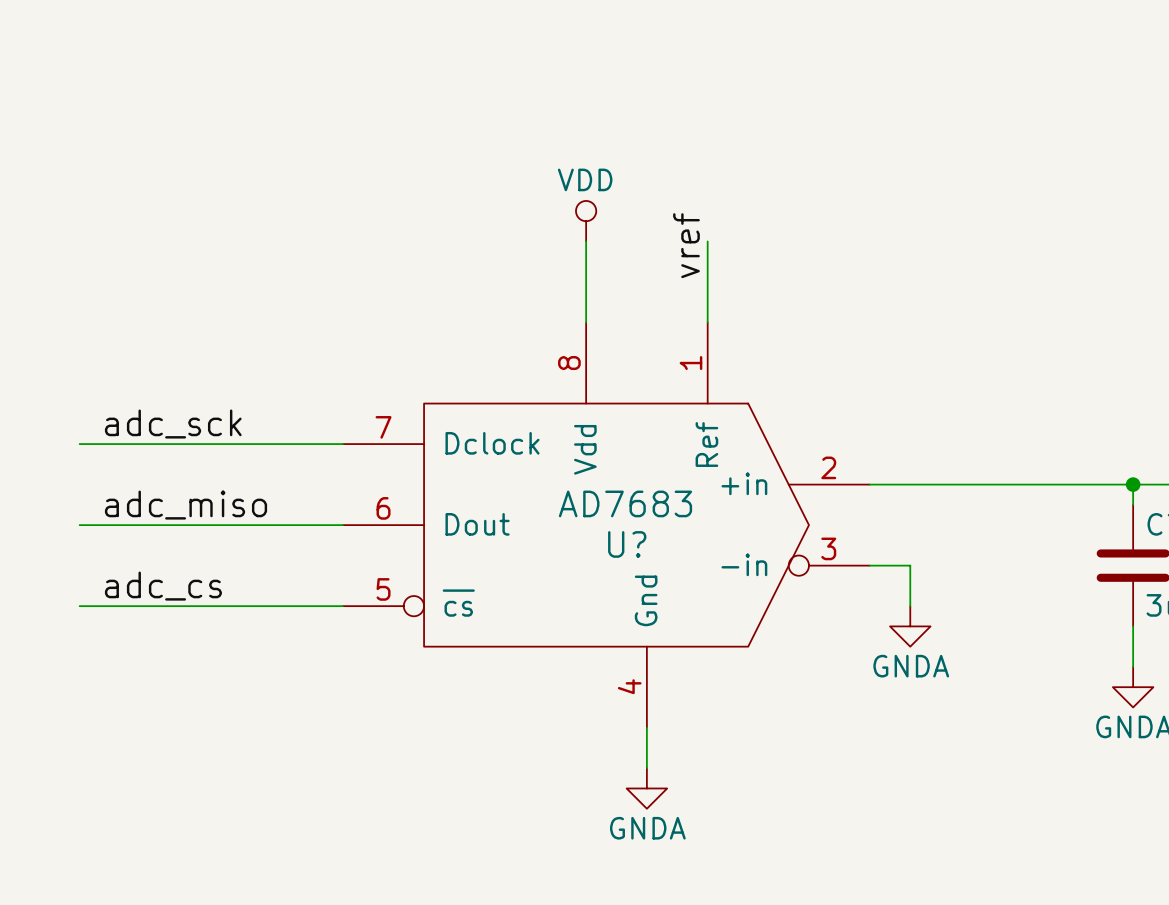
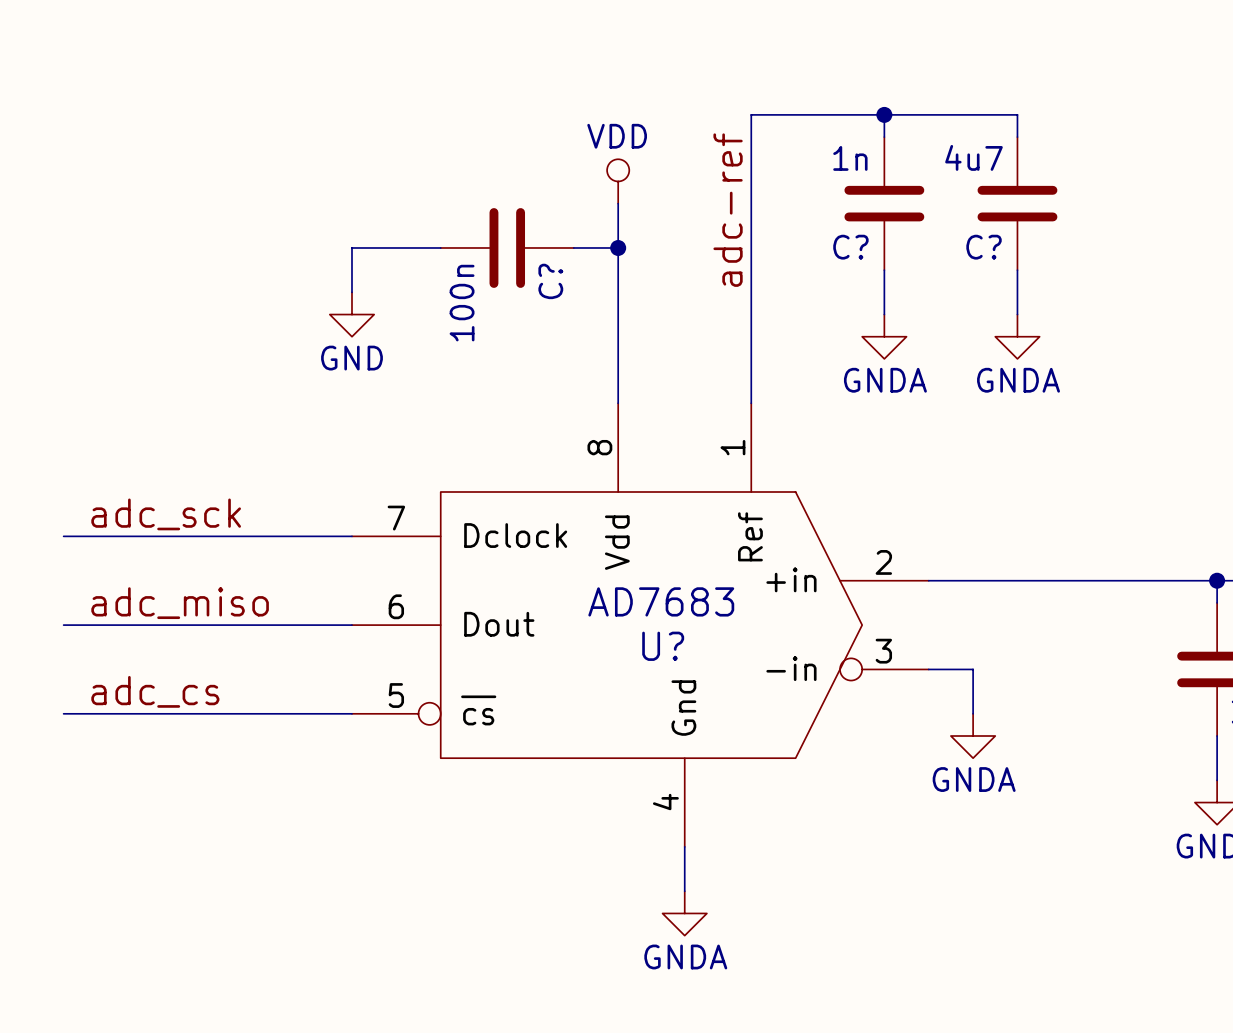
wire: none -> (884, 114) (884, 137)
junction: none -> (884, 114)
wire: none -> (1017, 137) (1017, 114) (751, 114) (751, 314)
wire: none -> (618, 203) (618, 314)
C?: none -> 1n (884, 203)
C?: none -> 4u7 (1017, 203)
label: none -> adc-ref (728, 210)
wire: none -> (440, 247) (351, 247) (351, 292)
C?: none -> 100n (507, 247)
wire: none -> (573, 247) (618, 247)
junction: none -> (618, 247)
wire: none -> (884, 270) (884, 314)
wire: none -> (1017, 270) (1017, 314)
power symbol position: VDD (586, 221) -> VDD (618, 181)
power symbol: none -> GND (351, 314)
label: vref (686, 245) -> none
power symbol: none -> GNDA (884, 336)
power symbol: none -> GNDA (1017, 336)

